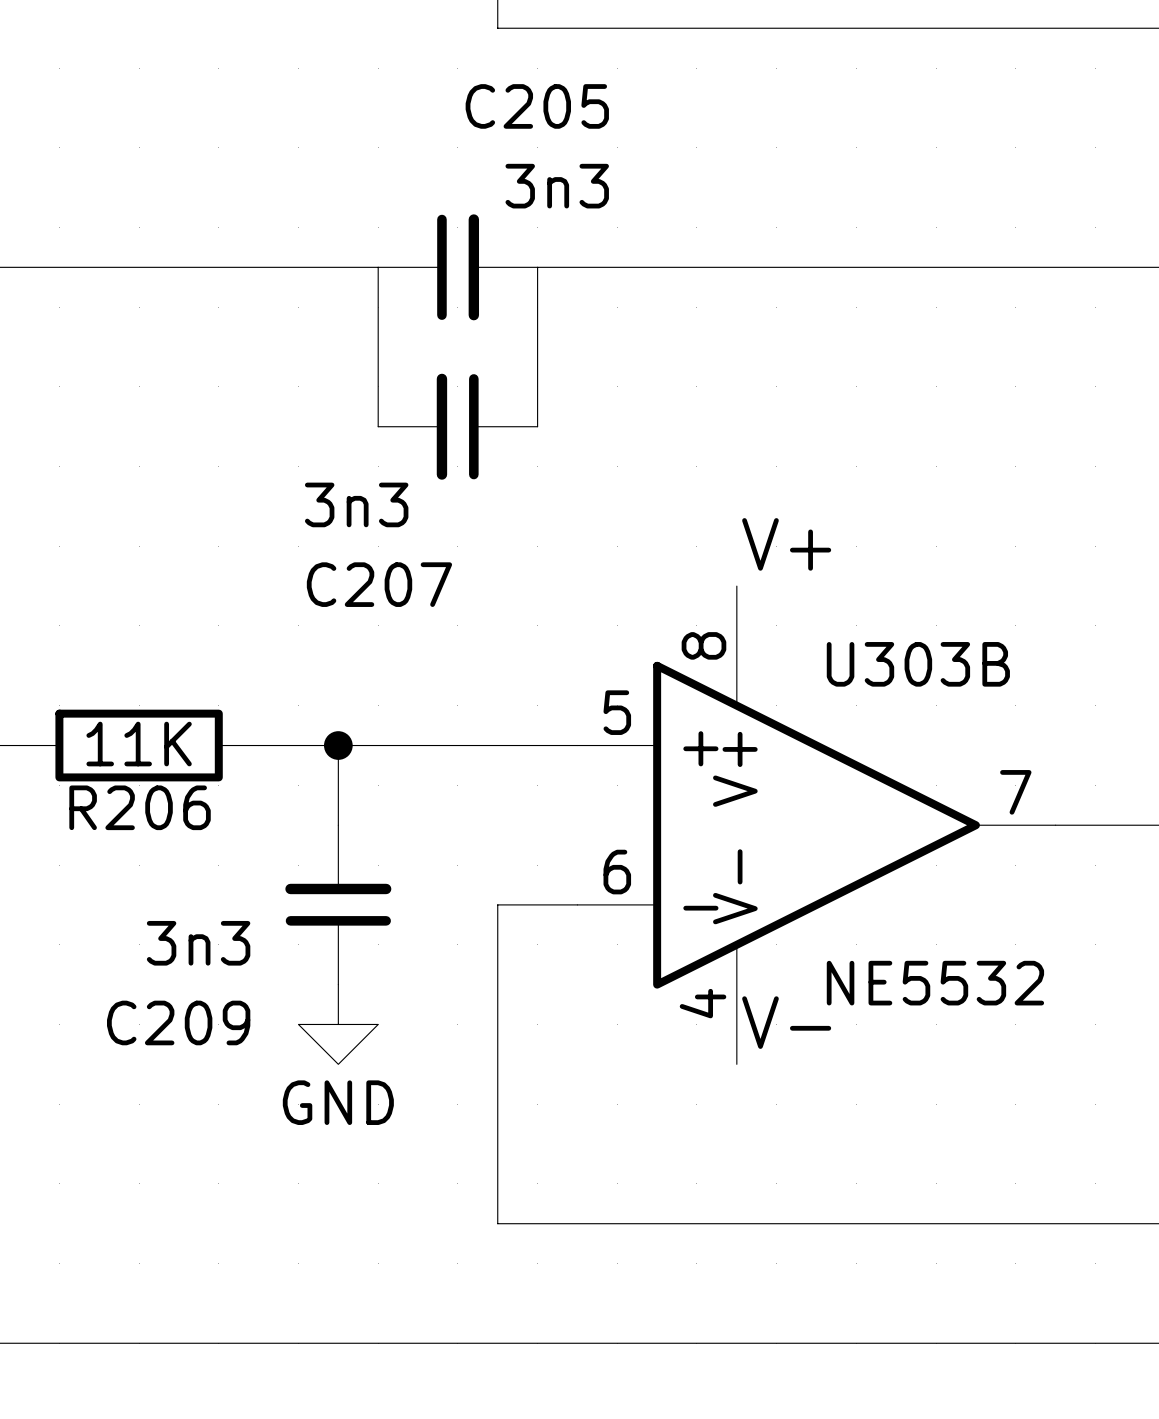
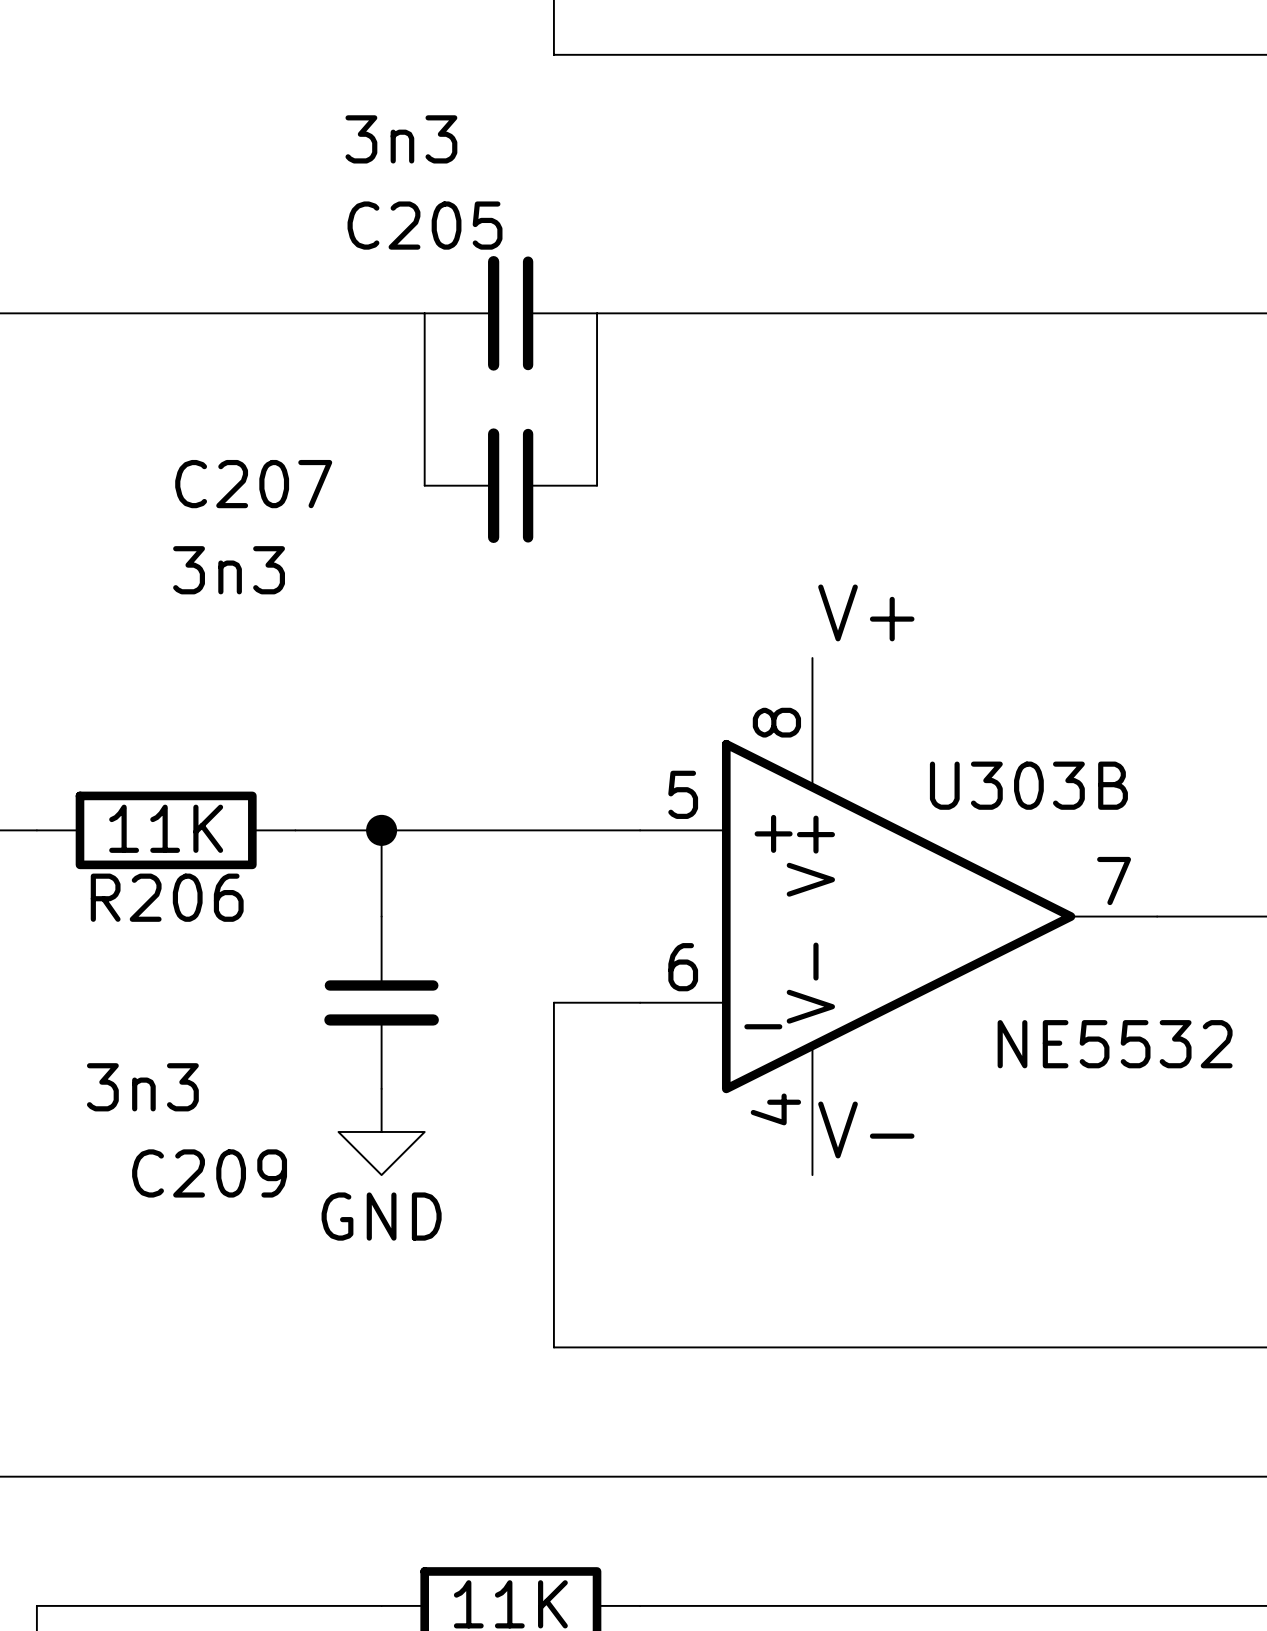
C205 name position: C205 (537, 106) -> C205 (425, 225)
C205 value position: 3n3 (557, 186) -> 3n3 (401, 139)
C205 rotation: 0° (458, 267) -> 180° (510, 313)
C207 value position: 3n3 (356, 504) -> 3n3 (229, 570)
C207 name position: C207 (379, 584) -> C207 (253, 484)
U303B name position: U303B (918, 664) -> U303B (1028, 785)
C209 rotation: 0° (338, 904) -> 180° (381, 1002)
U303B pin name: - (700, 908) -> _ (763, 1026)
C209 value position: 3n3 (198, 943) -> 3n3 (142, 1087)
U303B value position: NE5532 (935, 983) -> NE5532 (1115, 1044)

